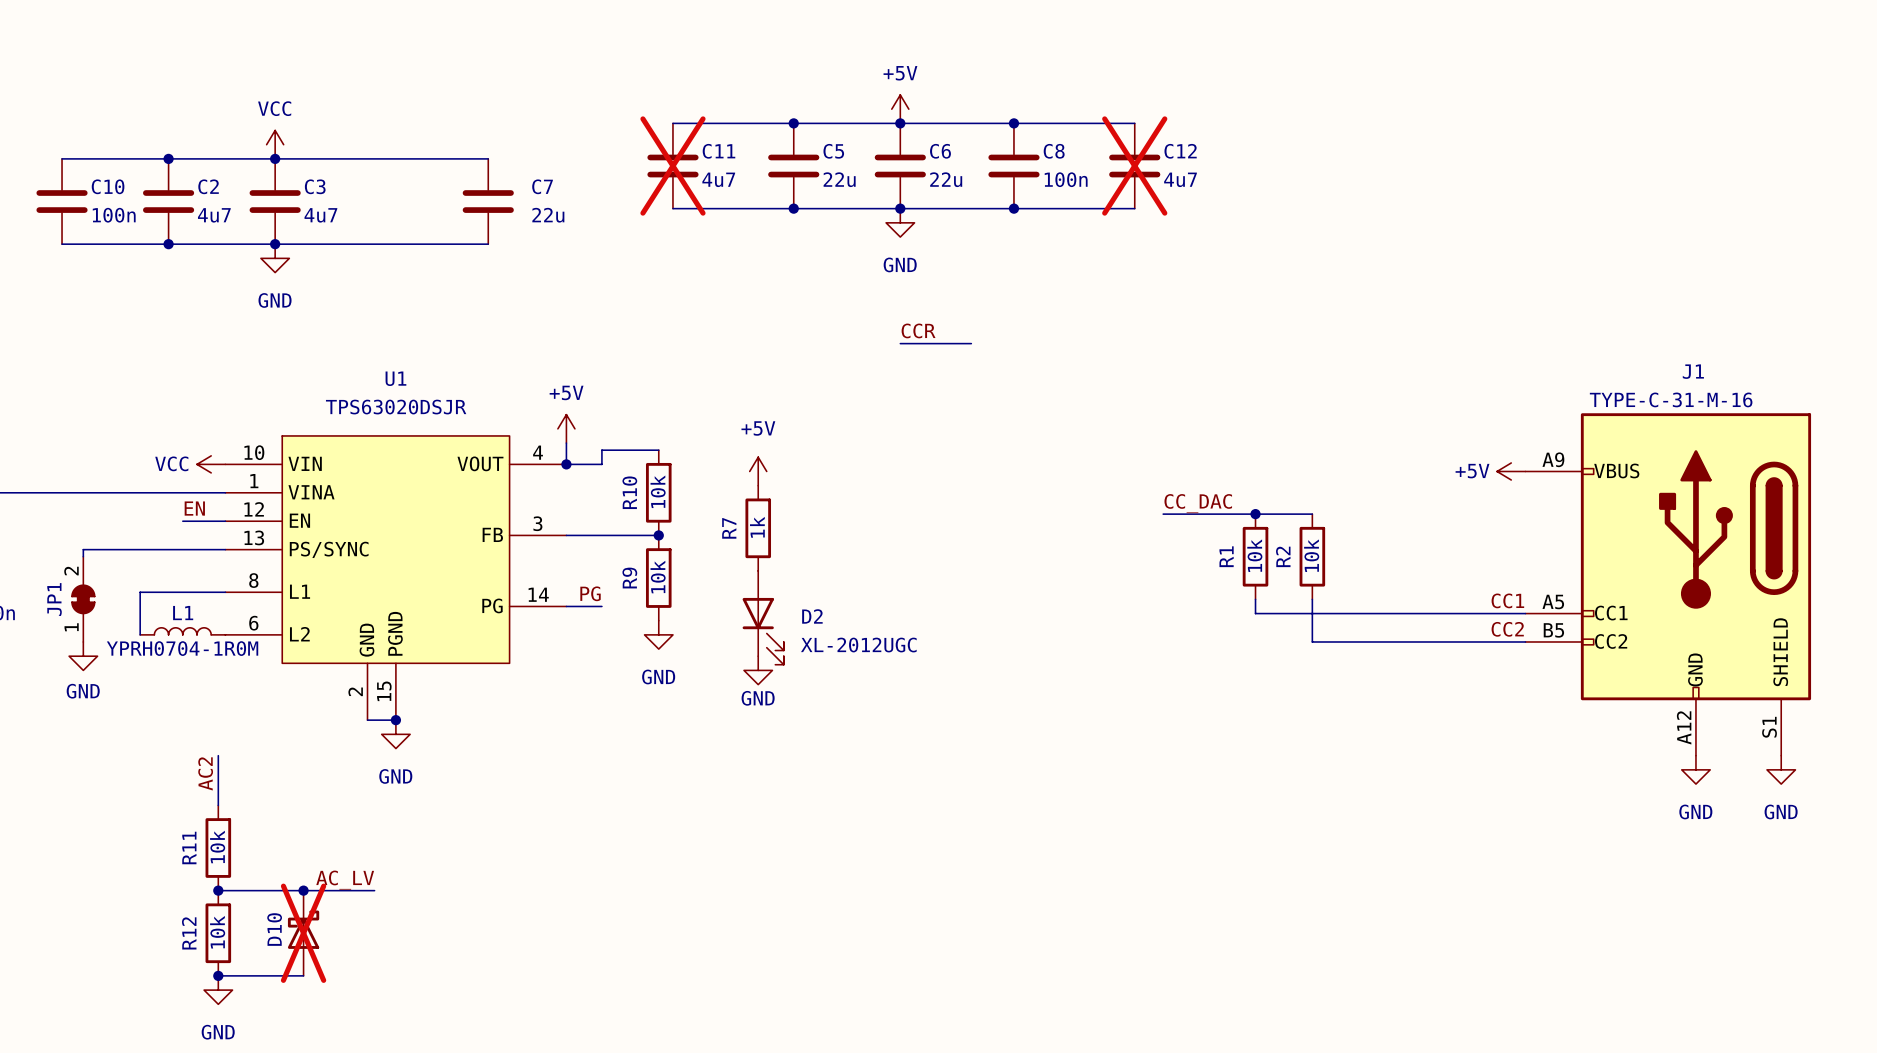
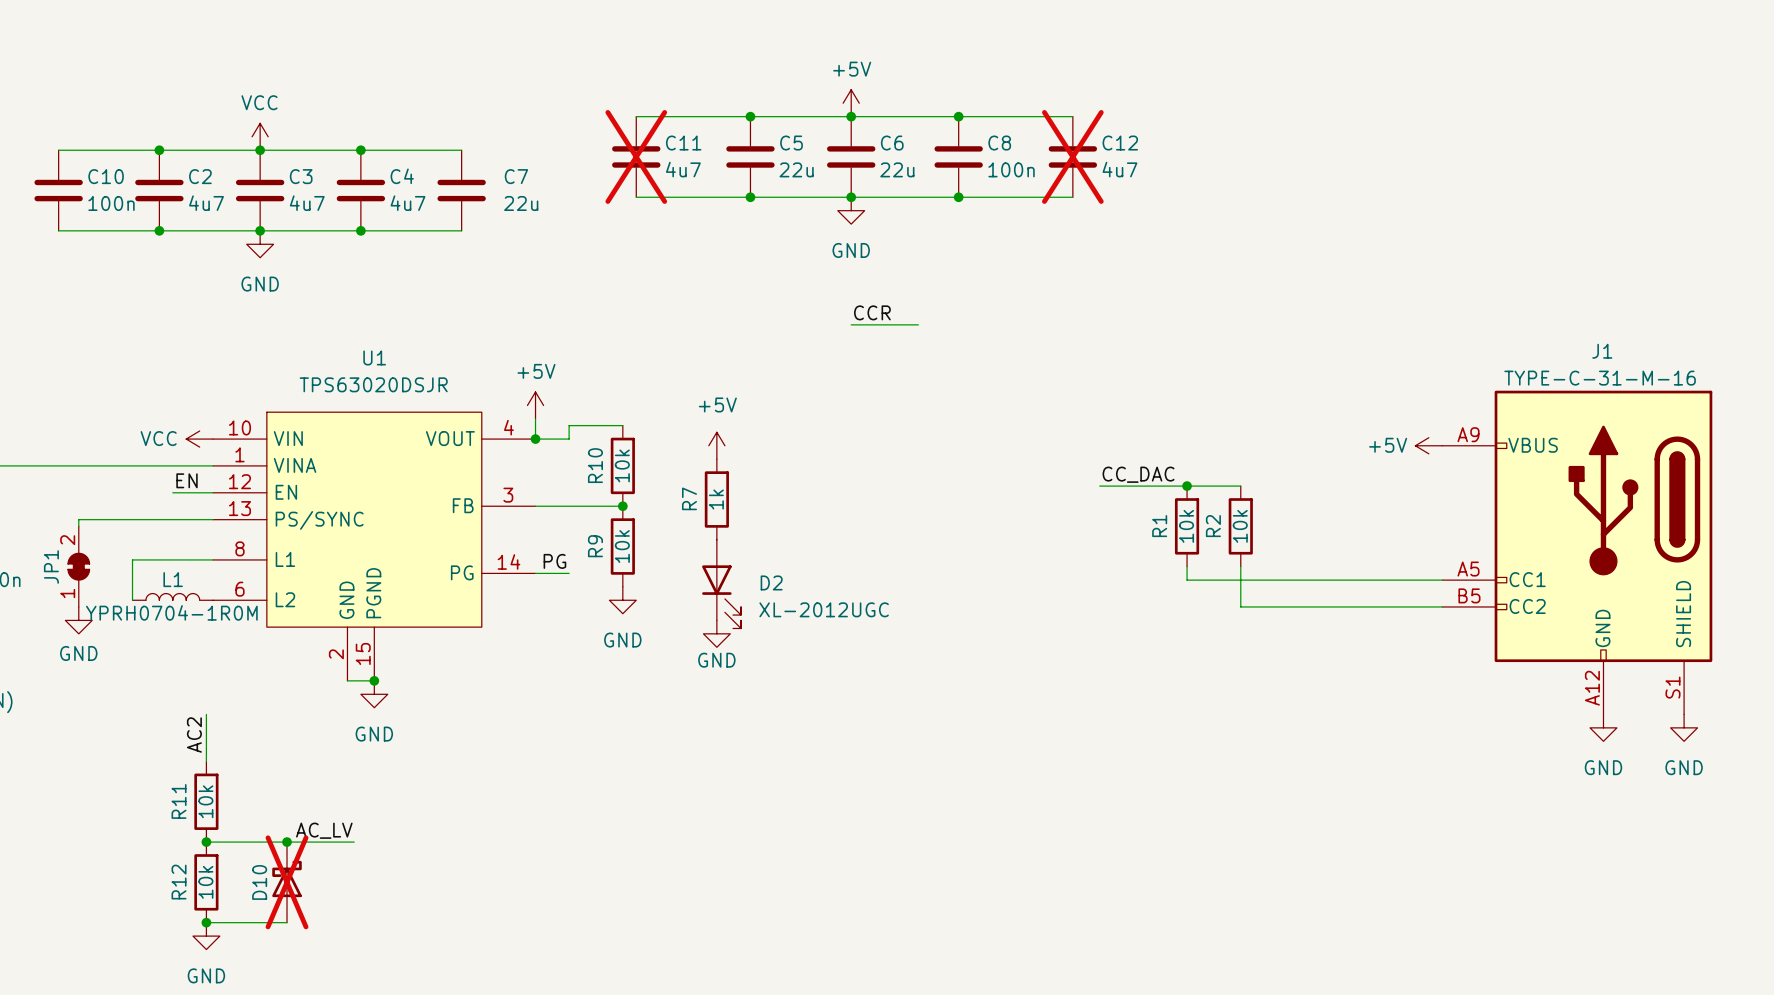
junction: none -> (360, 150)
C4: none -> 4u7 (360, 190)
junction: none -> (360, 230)
label: CC1 (1507, 600) -> none
label: CC2 (1507, 629) -> none

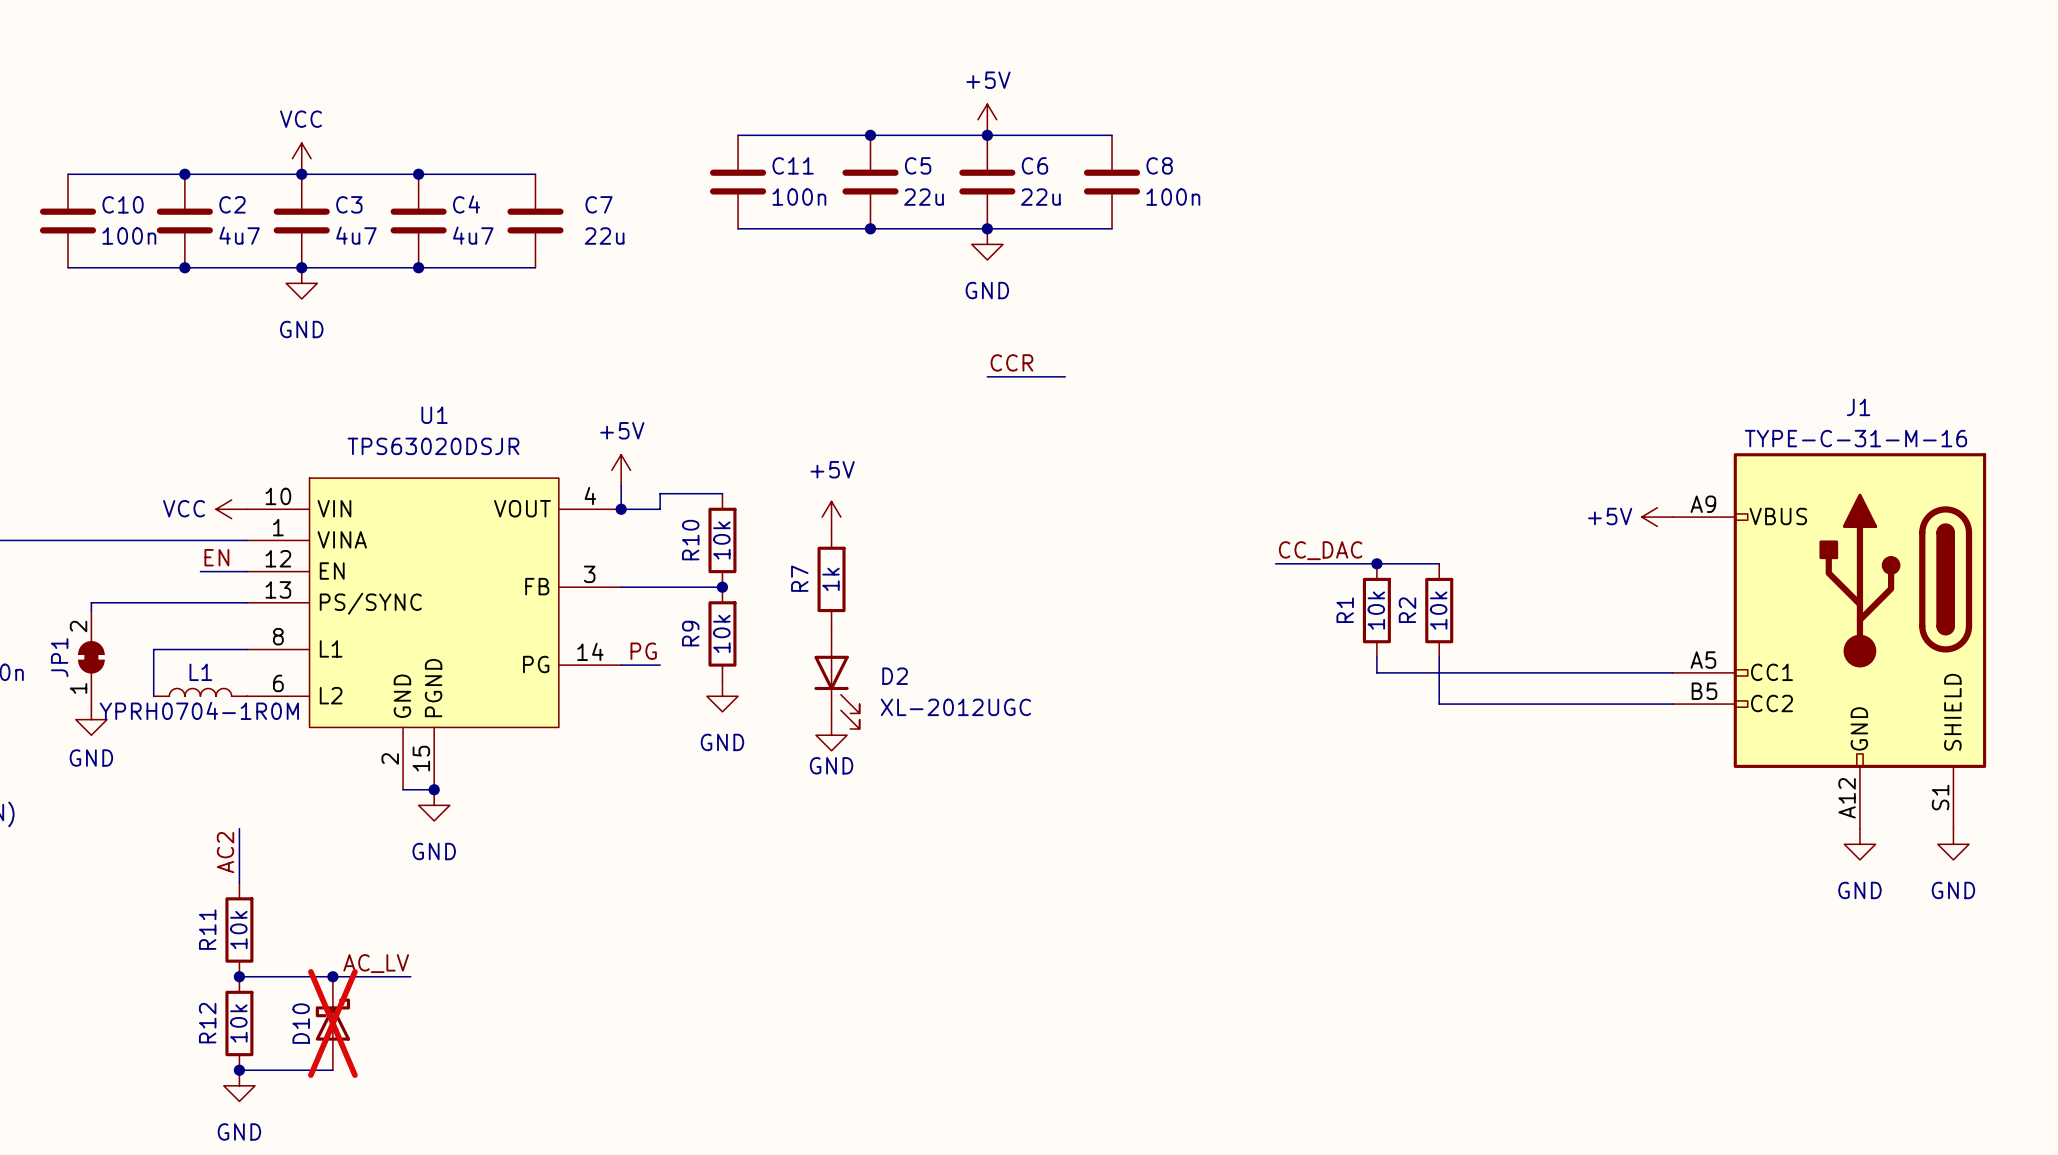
wire: (958, 116) (1072, 116) -> none
junction: (958, 116) -> none
C11 do-not-place cross: (636, 156) -> none
C12: 4u7 (1072, 156) -> none
C11 value: 4u7 (683, 169) -> 100n (799, 197)
wire: (958, 197) (1072, 197) -> none
junction: (958, 197) -> none

